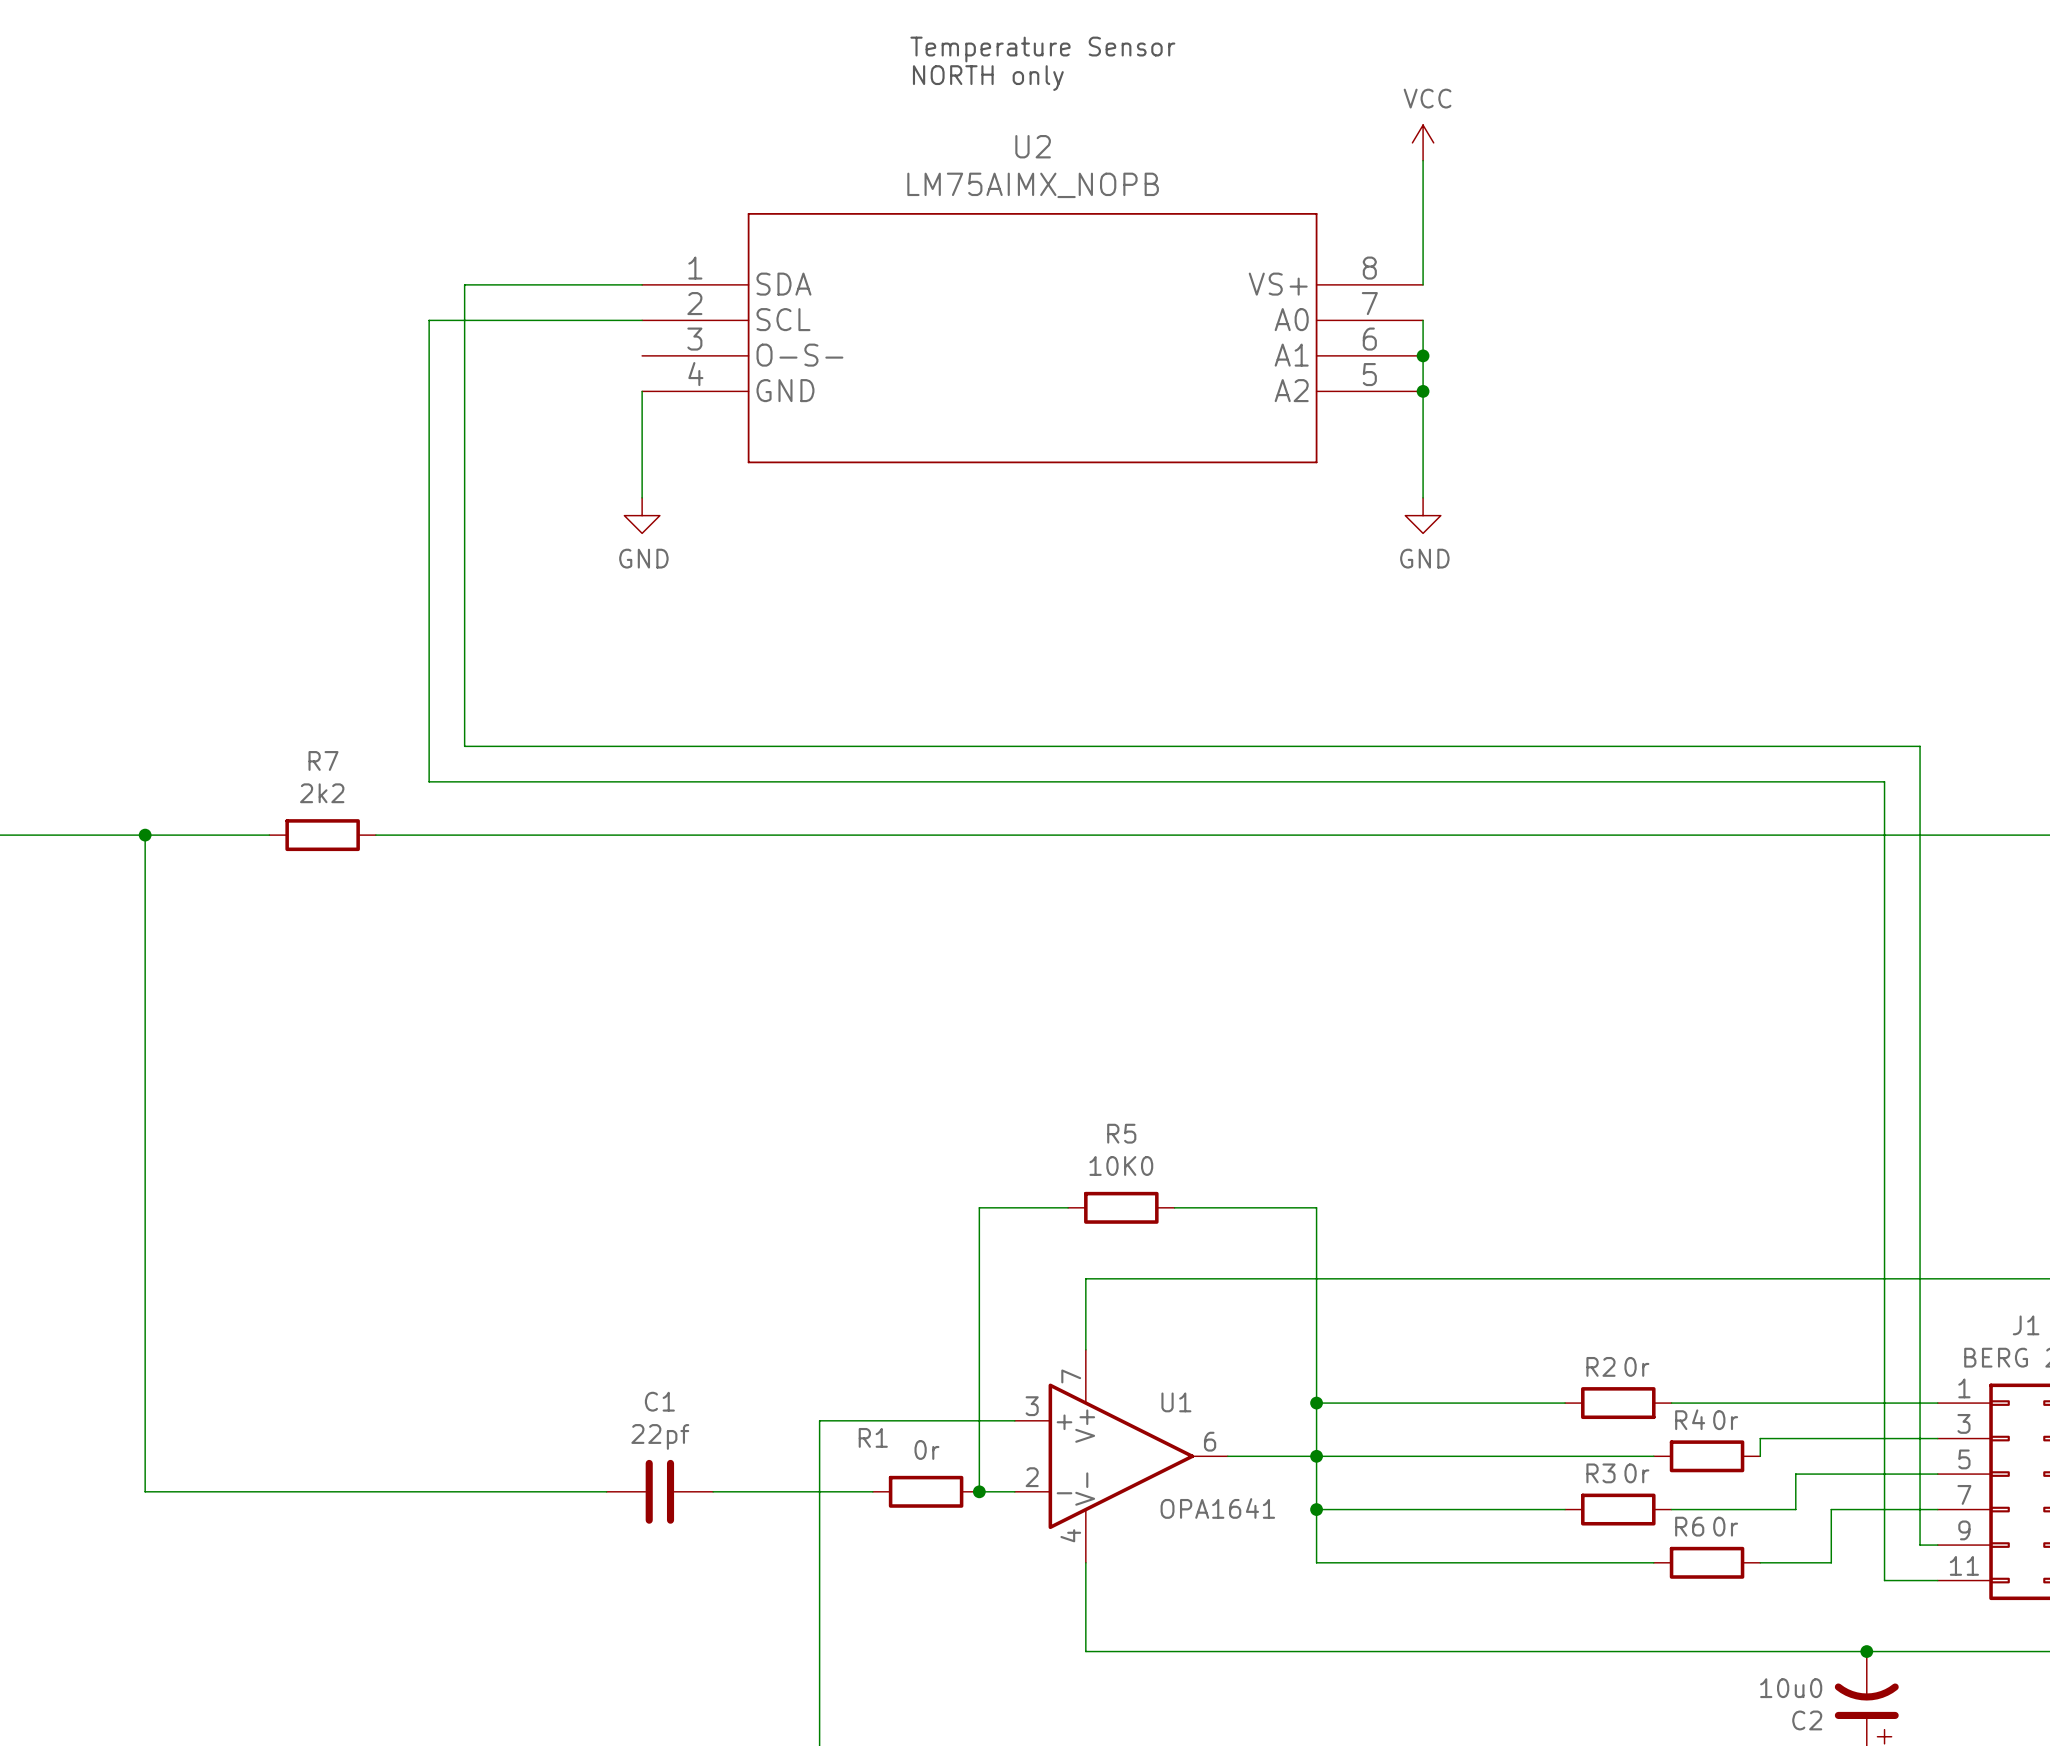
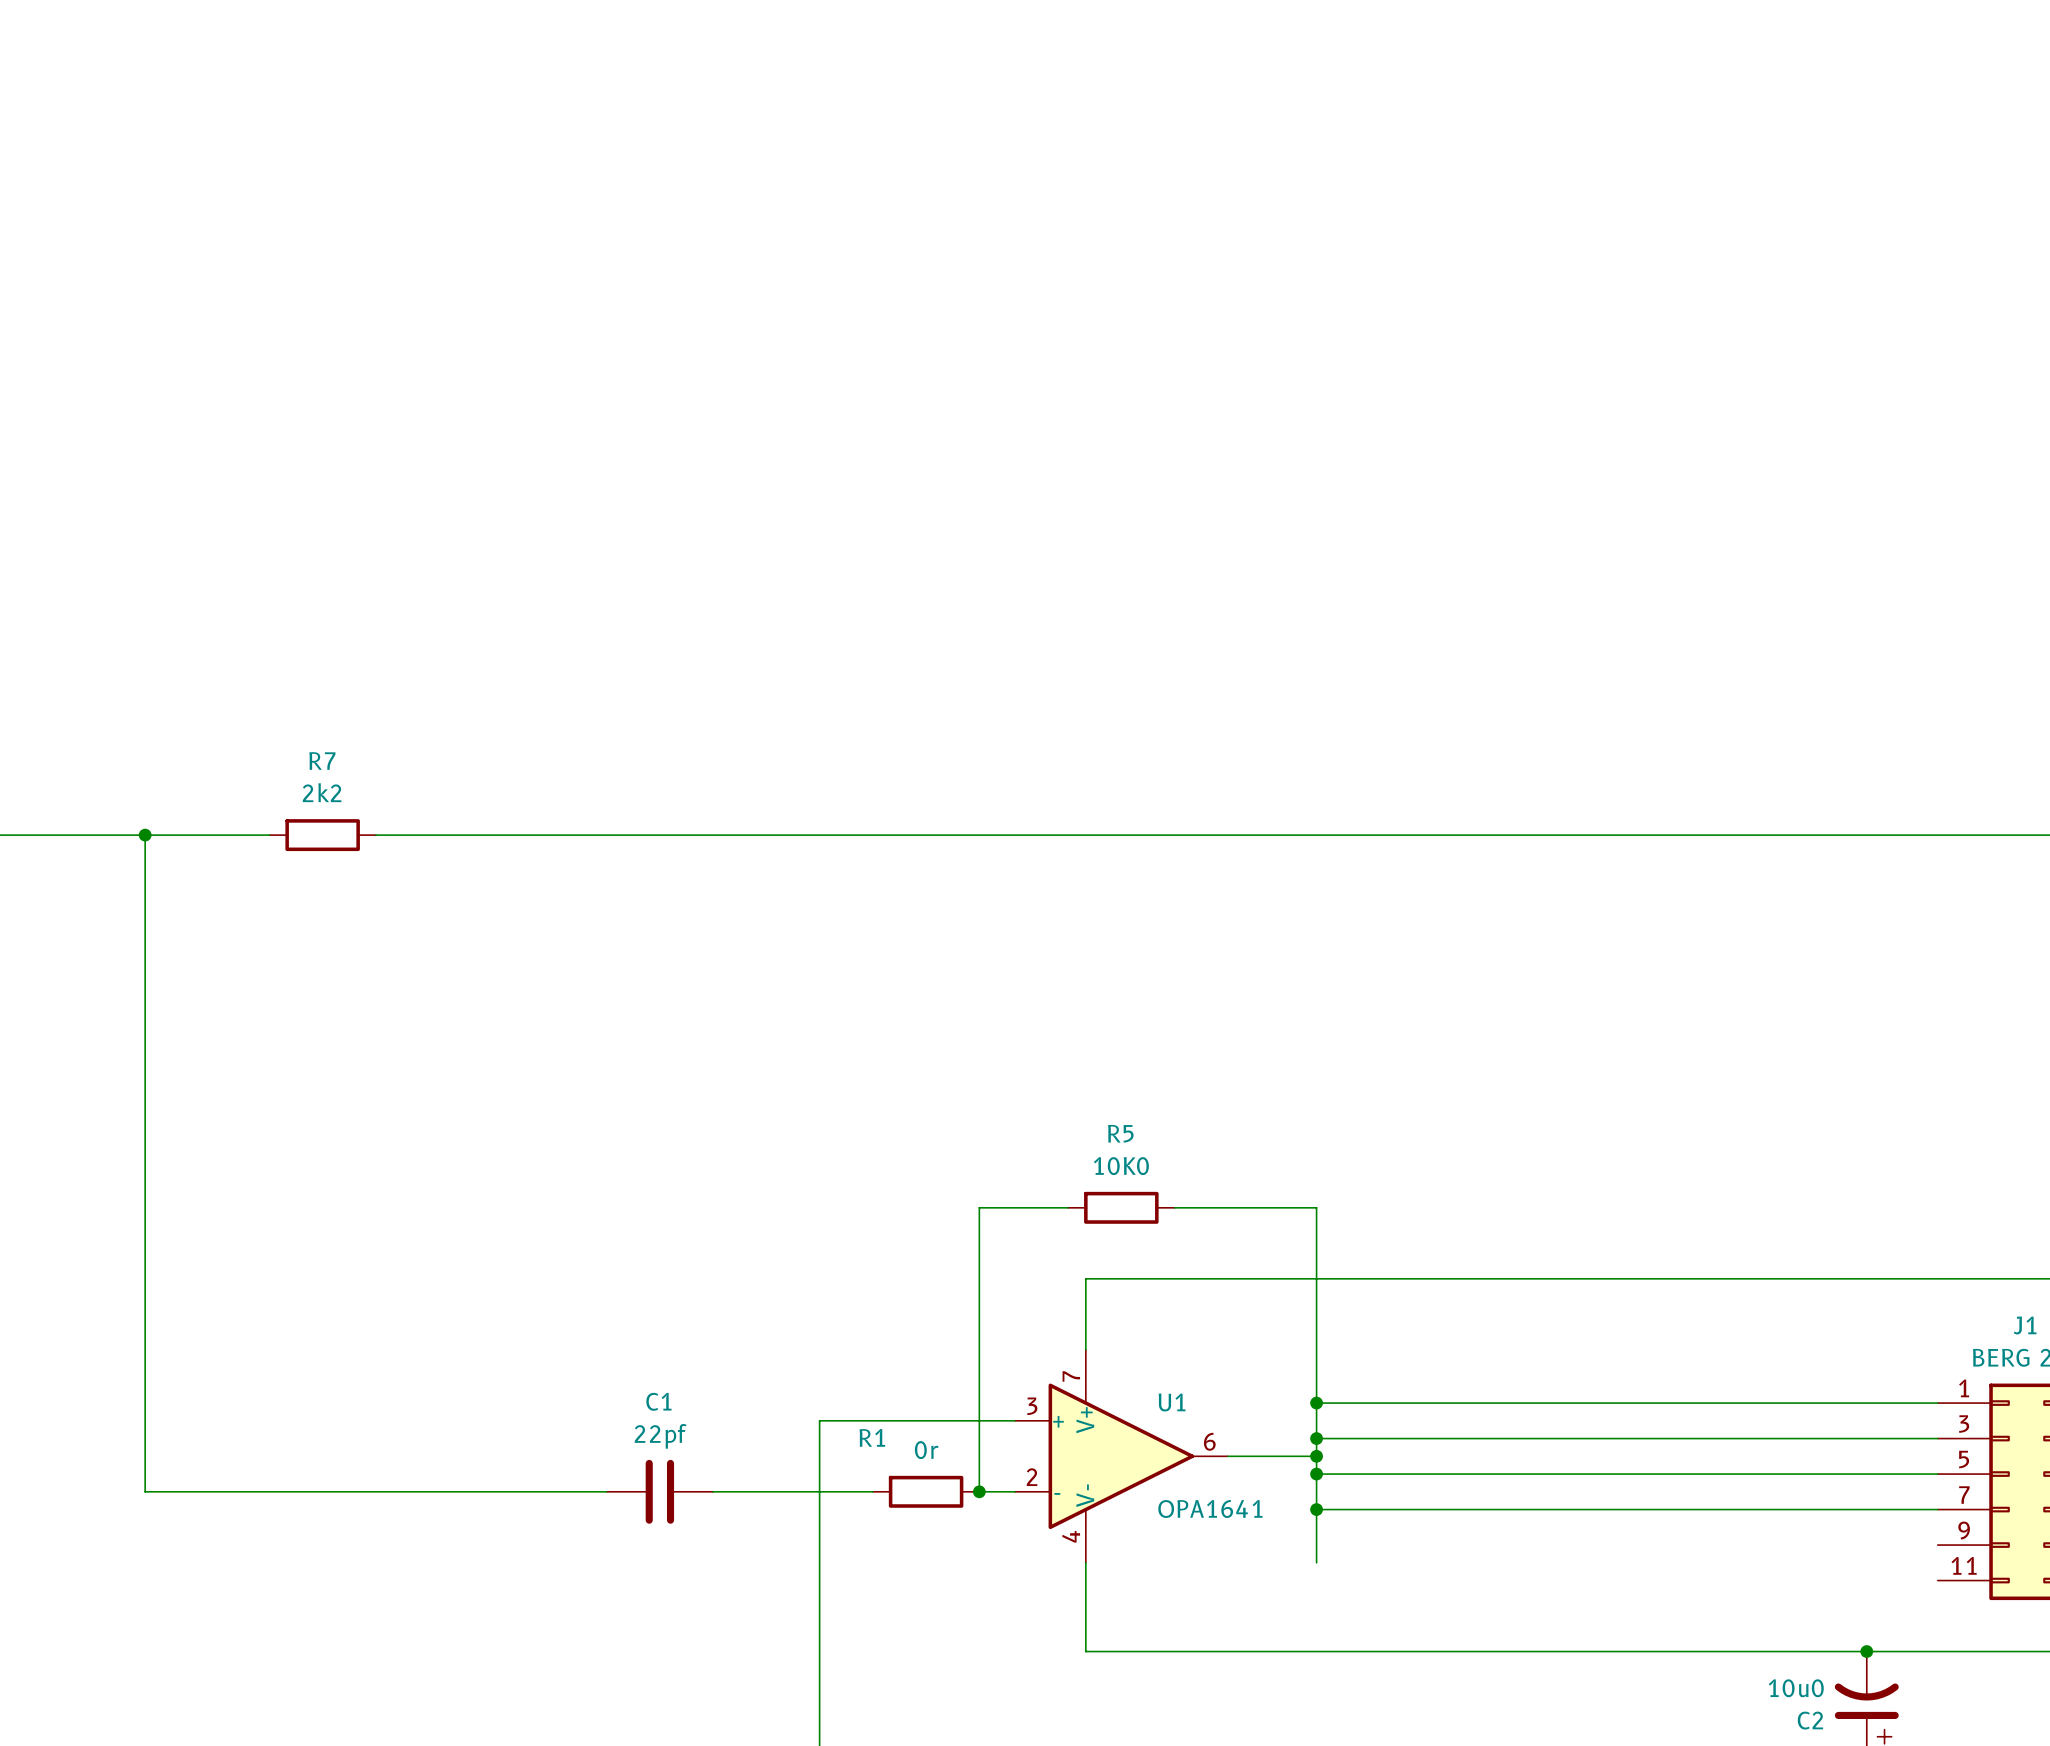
text: Temperature Sensor (1042, 49) -> none
text: NORTH only (988, 78) -> none
power symbol: VCC (1423, 142) -> none
wire: (1423, 160) (1423, 284) -> none
wire: (642, 284) (464, 284) (464, 746) (1920, 746) (1920, 1545) (1937, 1545) -> none
wire: (642, 320) (429, 320) (429, 781) (1884, 781) (1884, 1580) (1937, 1580) -> none
wire: (1423, 320) (1423, 497) -> none
U2: LM75AIMX_NOPB (1032, 338) -> none
junction: (1423, 355) -> none
wire: (642, 391) (642, 497) -> none
junction: (1423, 391) -> none
power symbol: GND (642, 515) -> none
power symbol: GND (1423, 515) -> none
wire: none -> (1565, 1403) (1671, 1403)
R2: 0r (1618, 1403) -> none
junction: none -> (1316, 1438)
wire: (1760, 1438) (1760, 1456) -> (1760, 1438) (1316, 1438)
wire: (1316, 1456) (1653, 1456) -> none
R4: 0r (1707, 1456) -> none
wire: none -> (1316, 1474) (1795, 1474)
junction: none -> (1316, 1474)
wire: (1795, 1474) (1795, 1509) -> (1831, 1509) (1795, 1509)
wire: none -> (1565, 1509) (1671, 1509)
R3: 0r (1618, 1509) -> none
wire: (1831, 1509) (1831, 1562) (1760, 1562) -> none
wire: (1316, 1562) (1653, 1562) -> none
R6: 0r (1707, 1562) -> none

